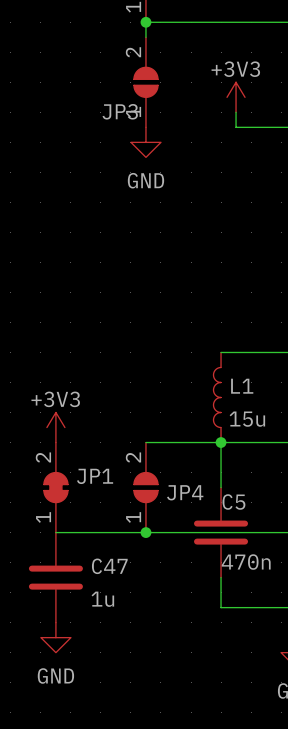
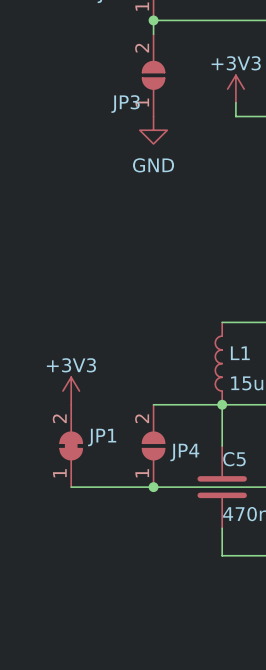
C47: 1u (55, 577) -> none
power symbol: GND (55, 637) -> none

